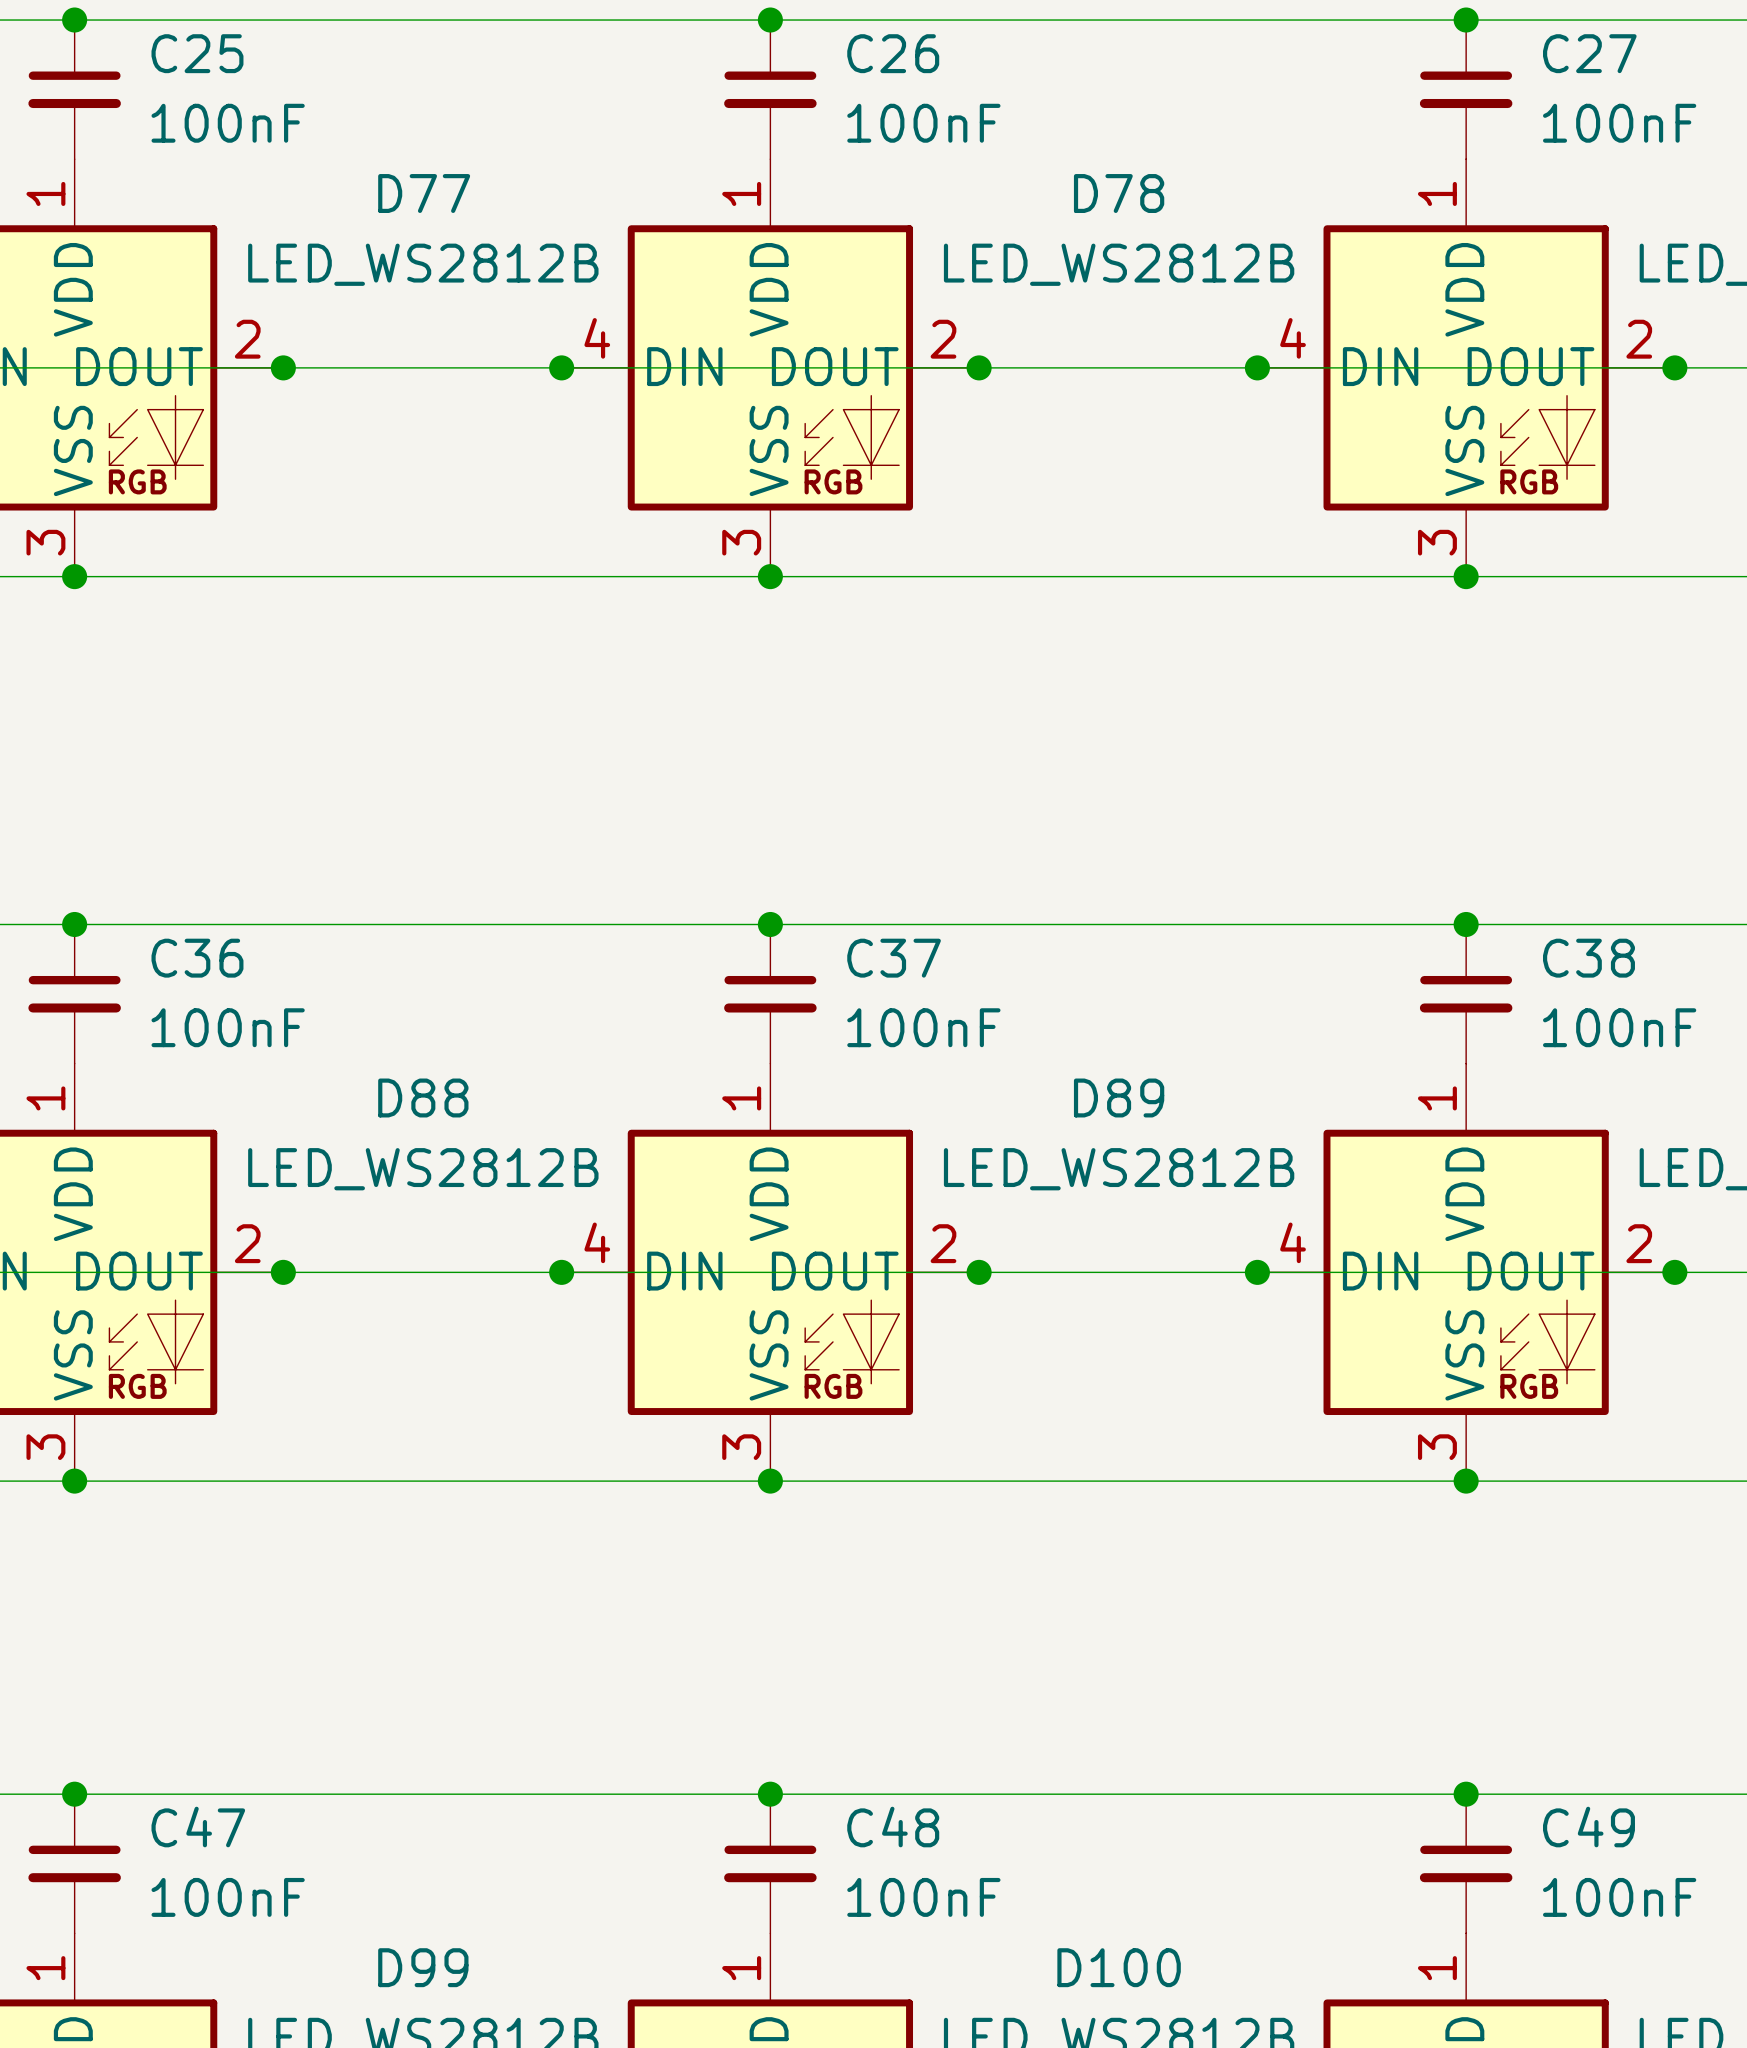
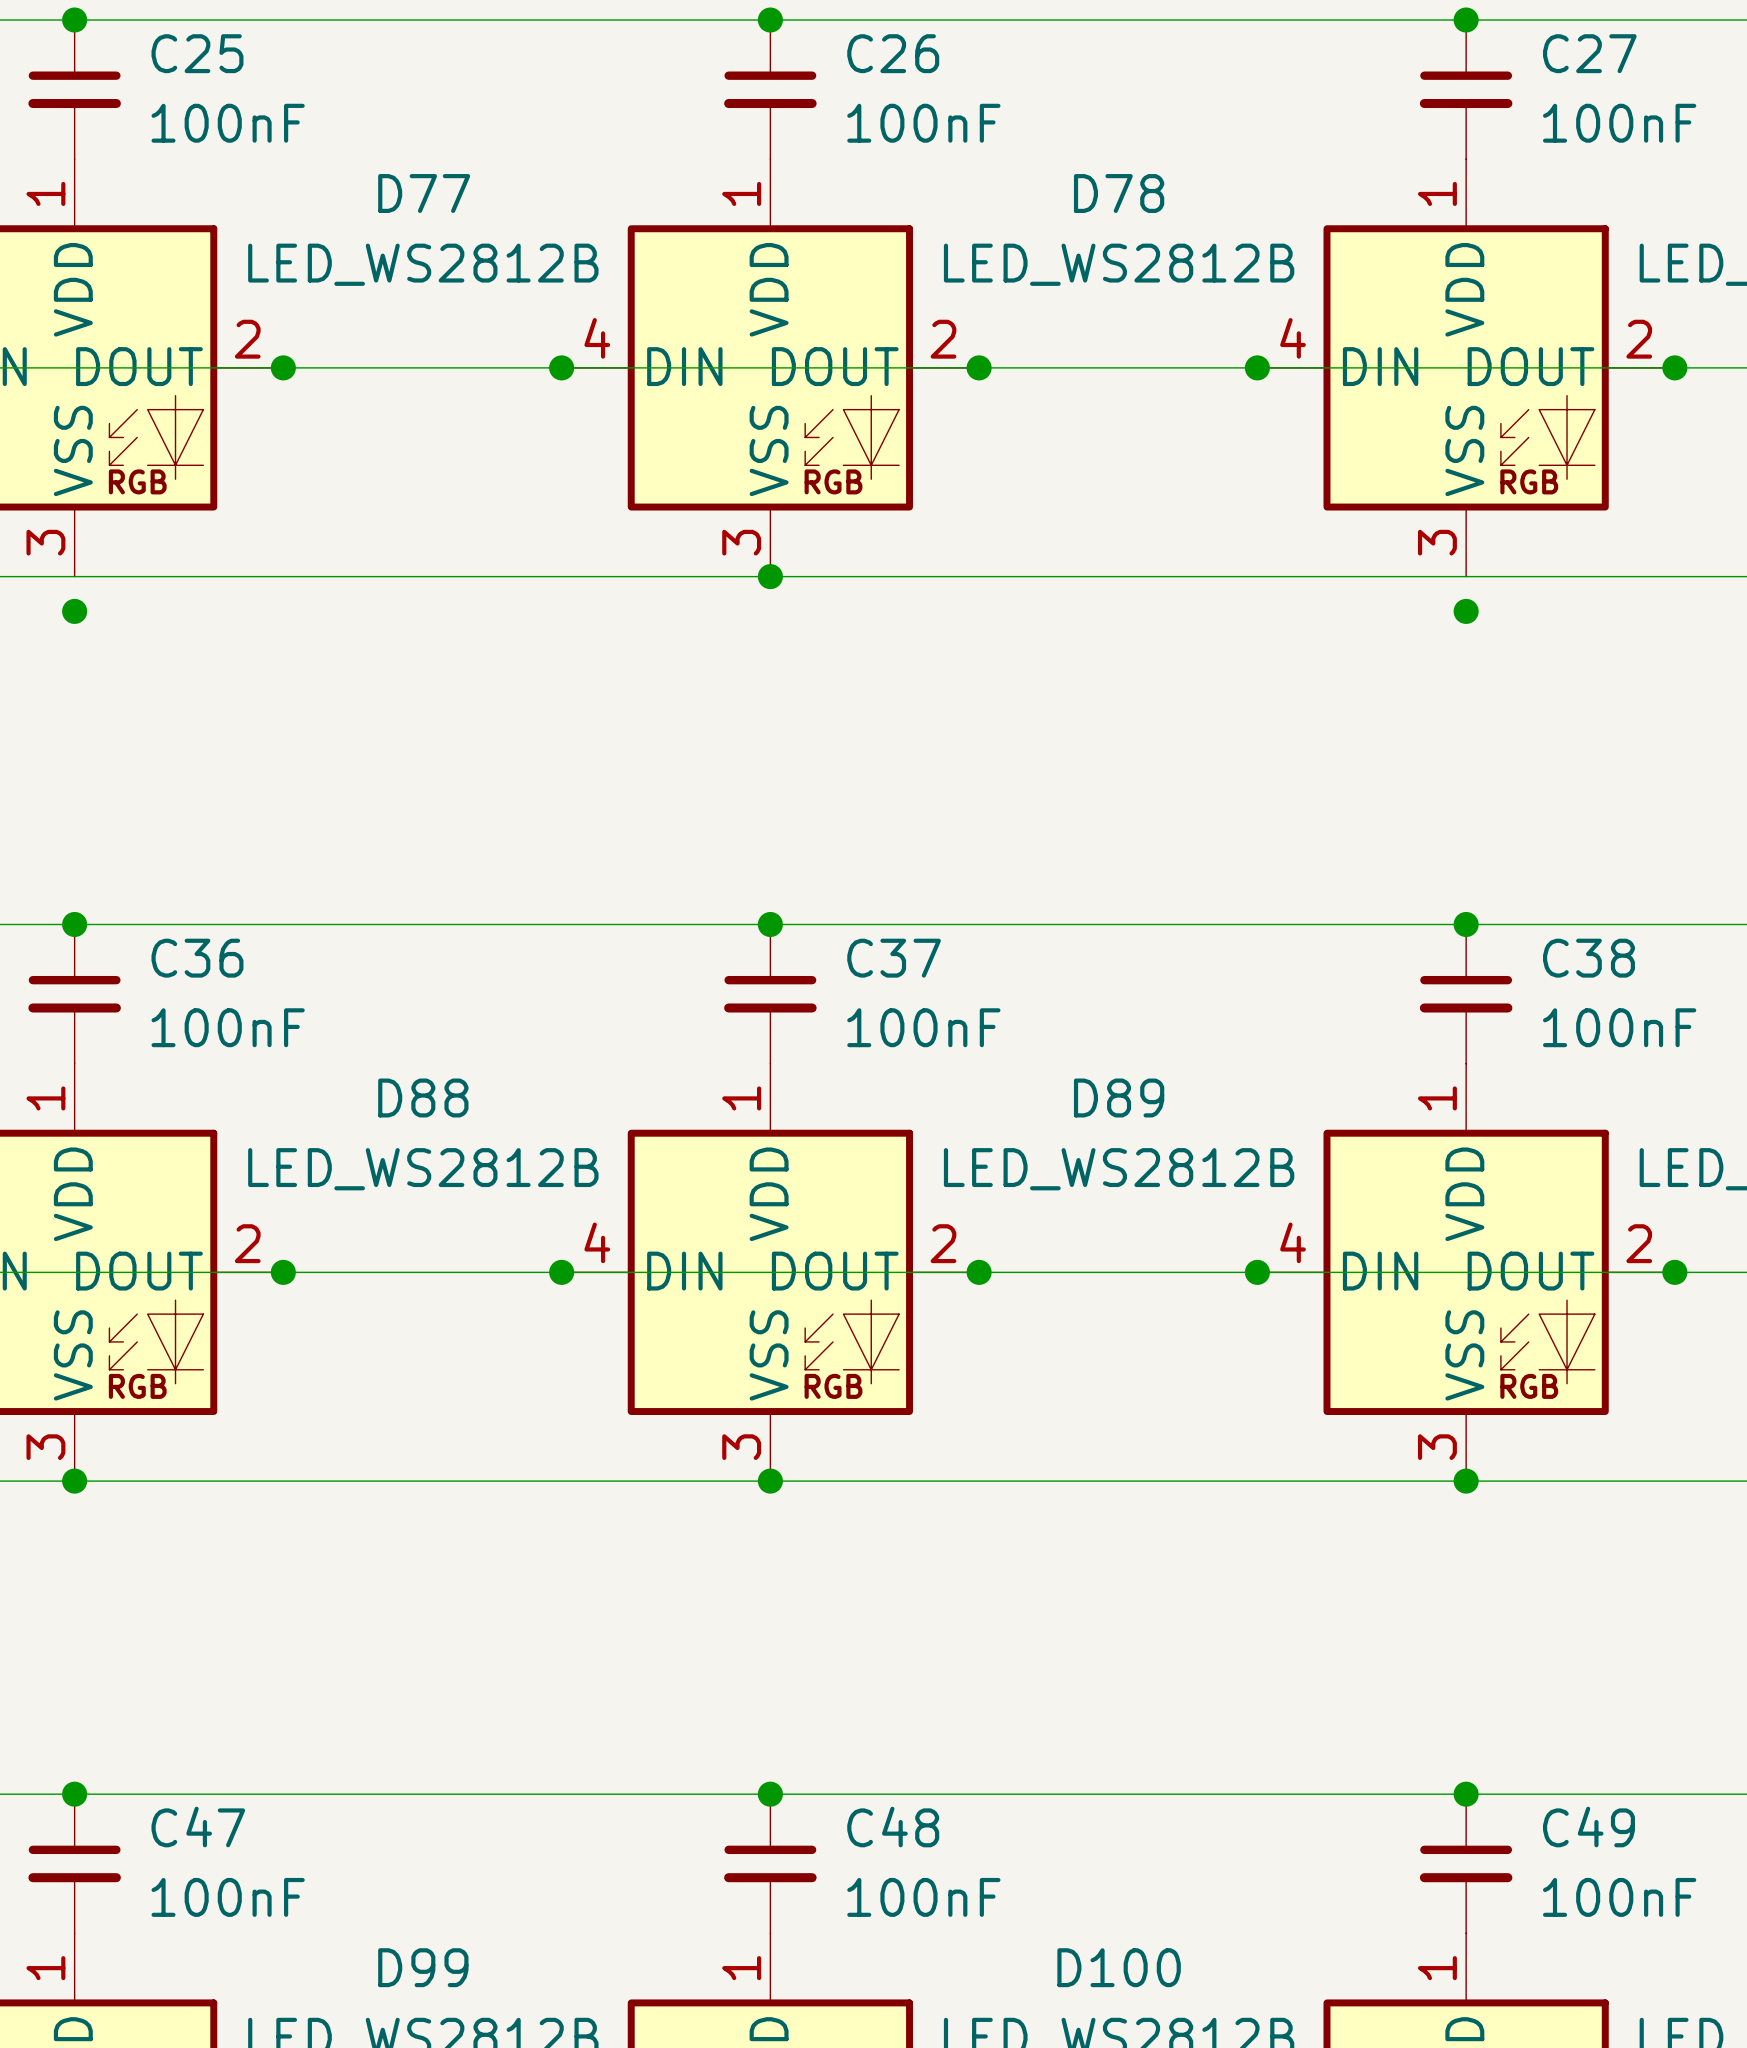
junction position: (74, 576) -> (74, 611)
junction position: (1466, 576) -> (1466, 611)

